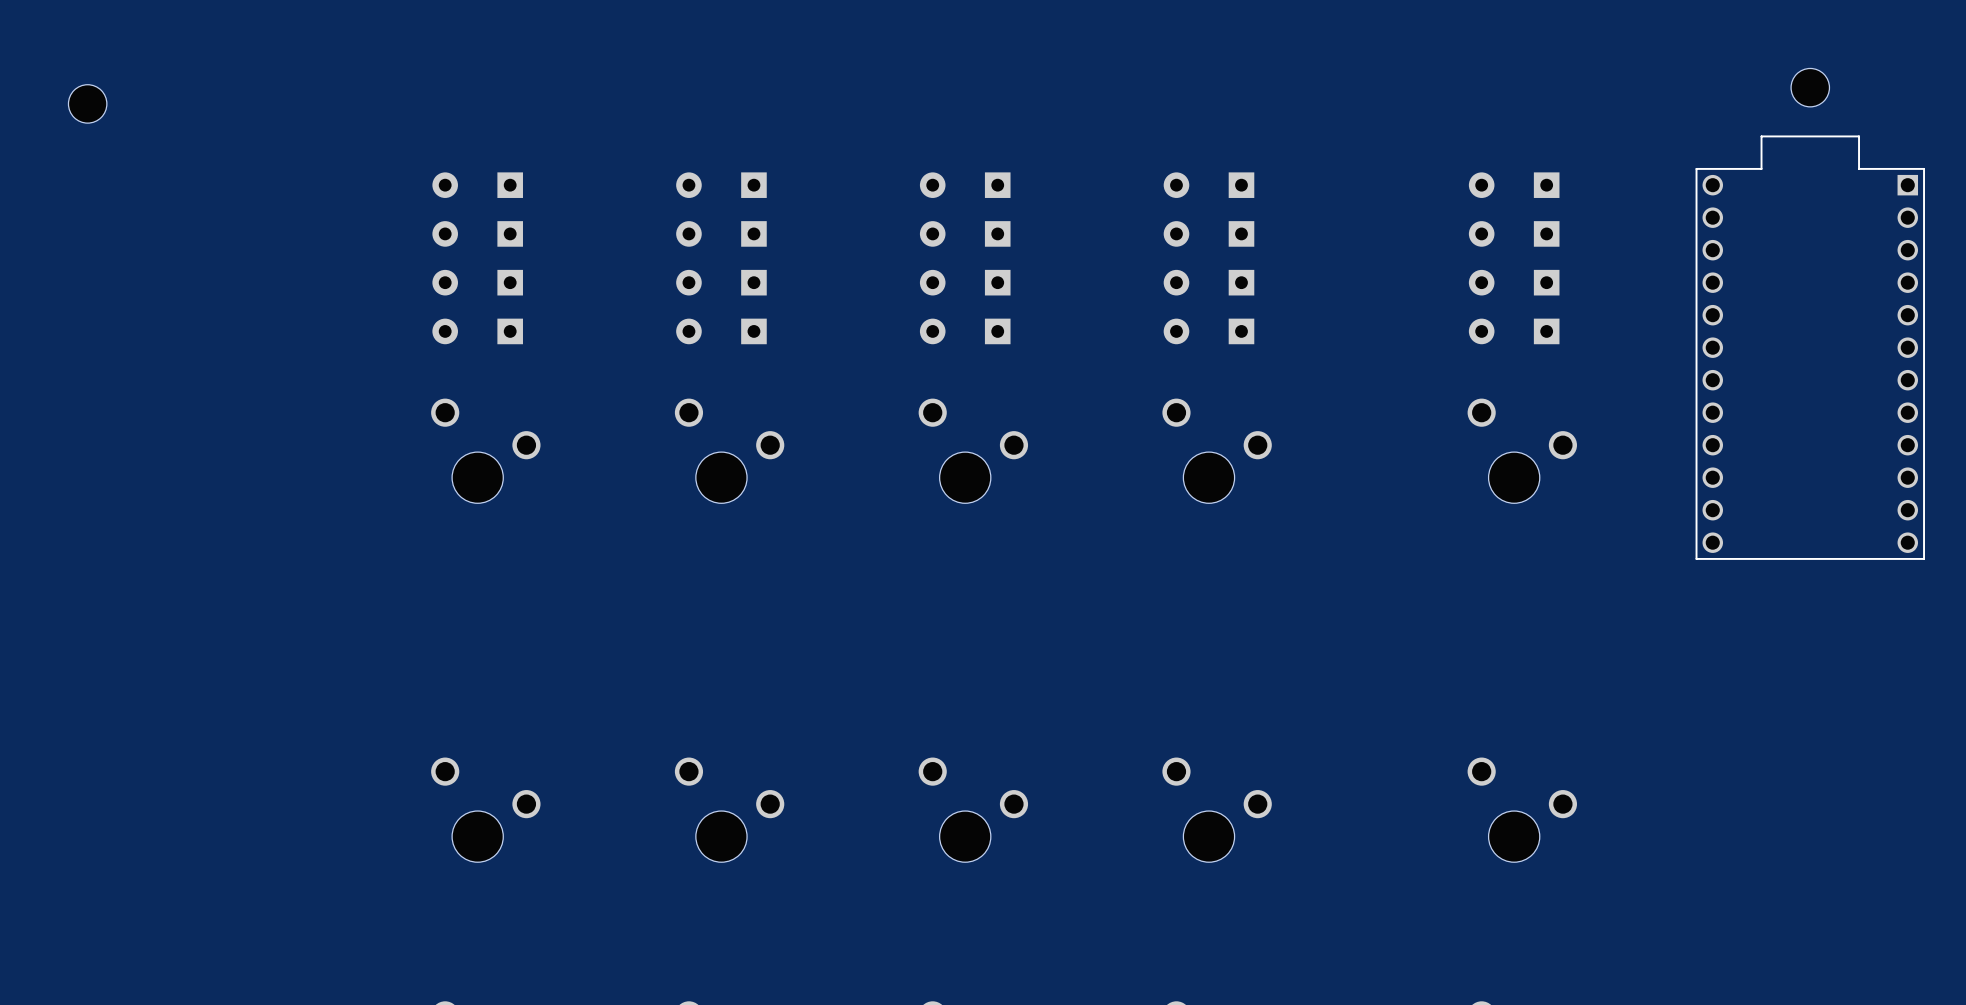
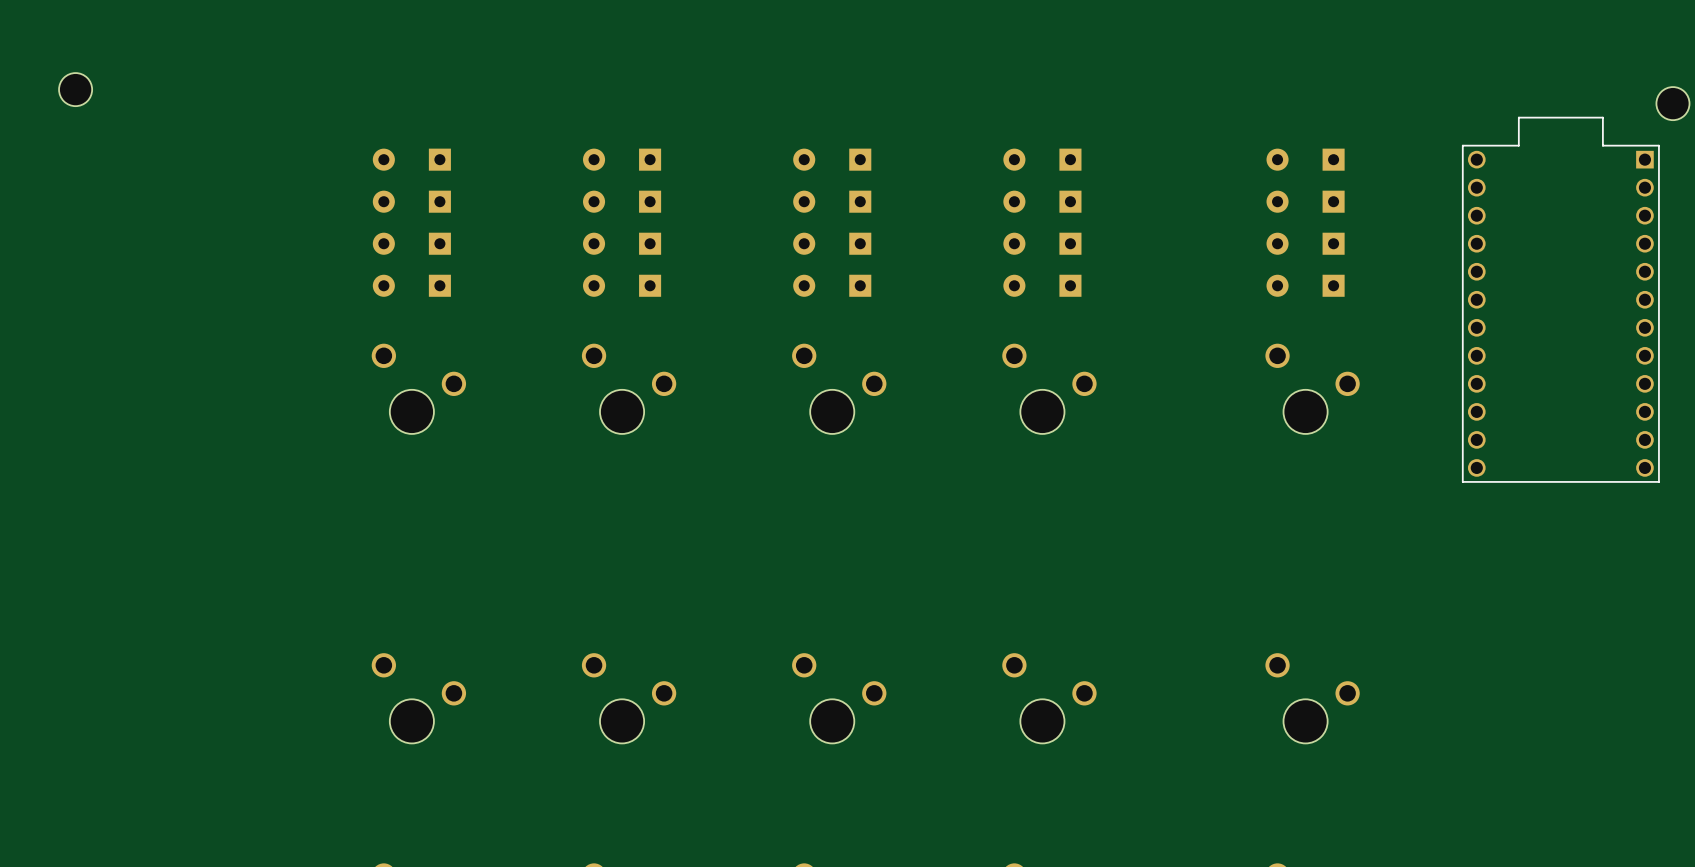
part position: (1810, 87) -> (1672, 103)

